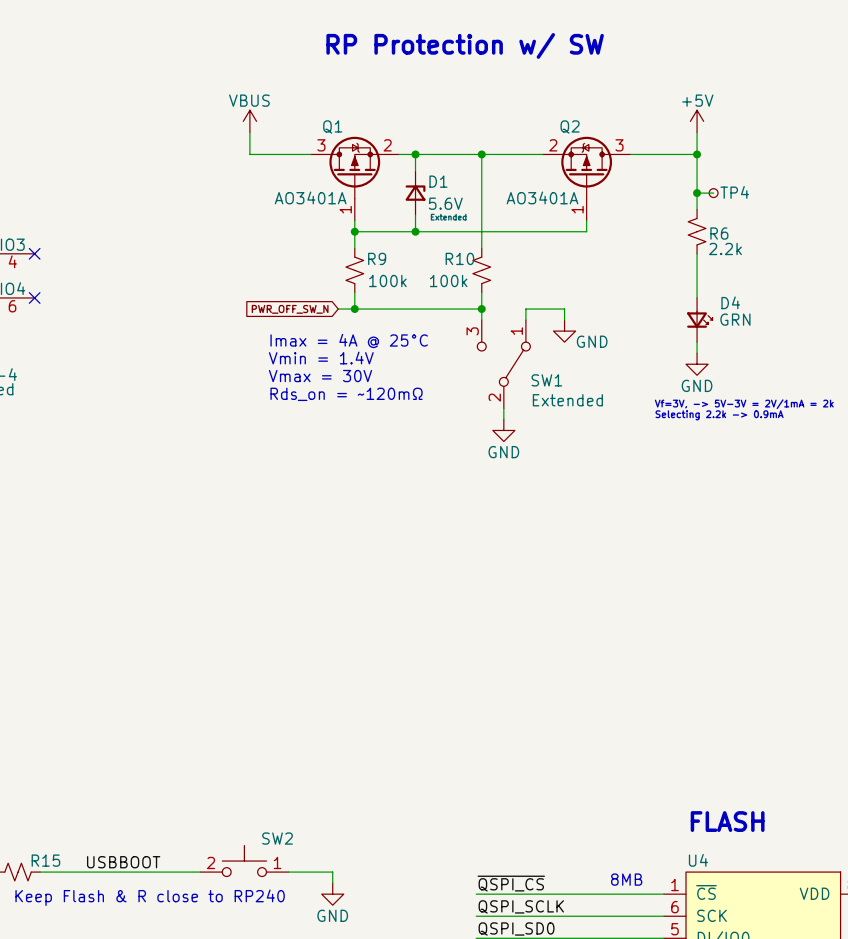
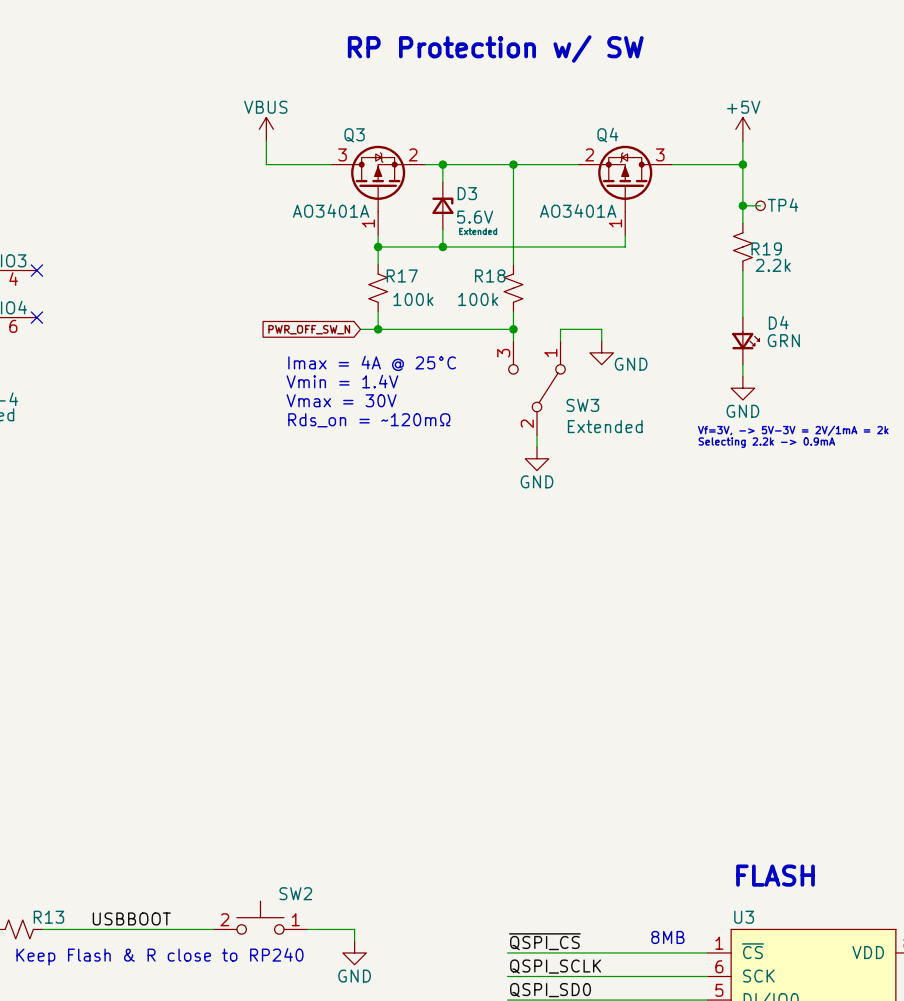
Q1 name: Q1 (332, 126) -> Q3 (354, 135)
Q2 name: Q2 (570, 126) -> Q4 (607, 135)
D1 name: D1 (438, 181) -> D3 (467, 193)
R6 name: R6 (719, 233) -> R19 (766, 248)
R9 name: R9 (377, 258) -> R17 (402, 275)
R10 name: R10 (459, 258) -> R18 (490, 275)
SW1 name: SW1 (546, 380) -> SW3 (582, 405)
R15 name: R15 (45, 860) -> R13 (48, 917)
U4 name: U4 (698, 860) -> U3 (744, 917)

